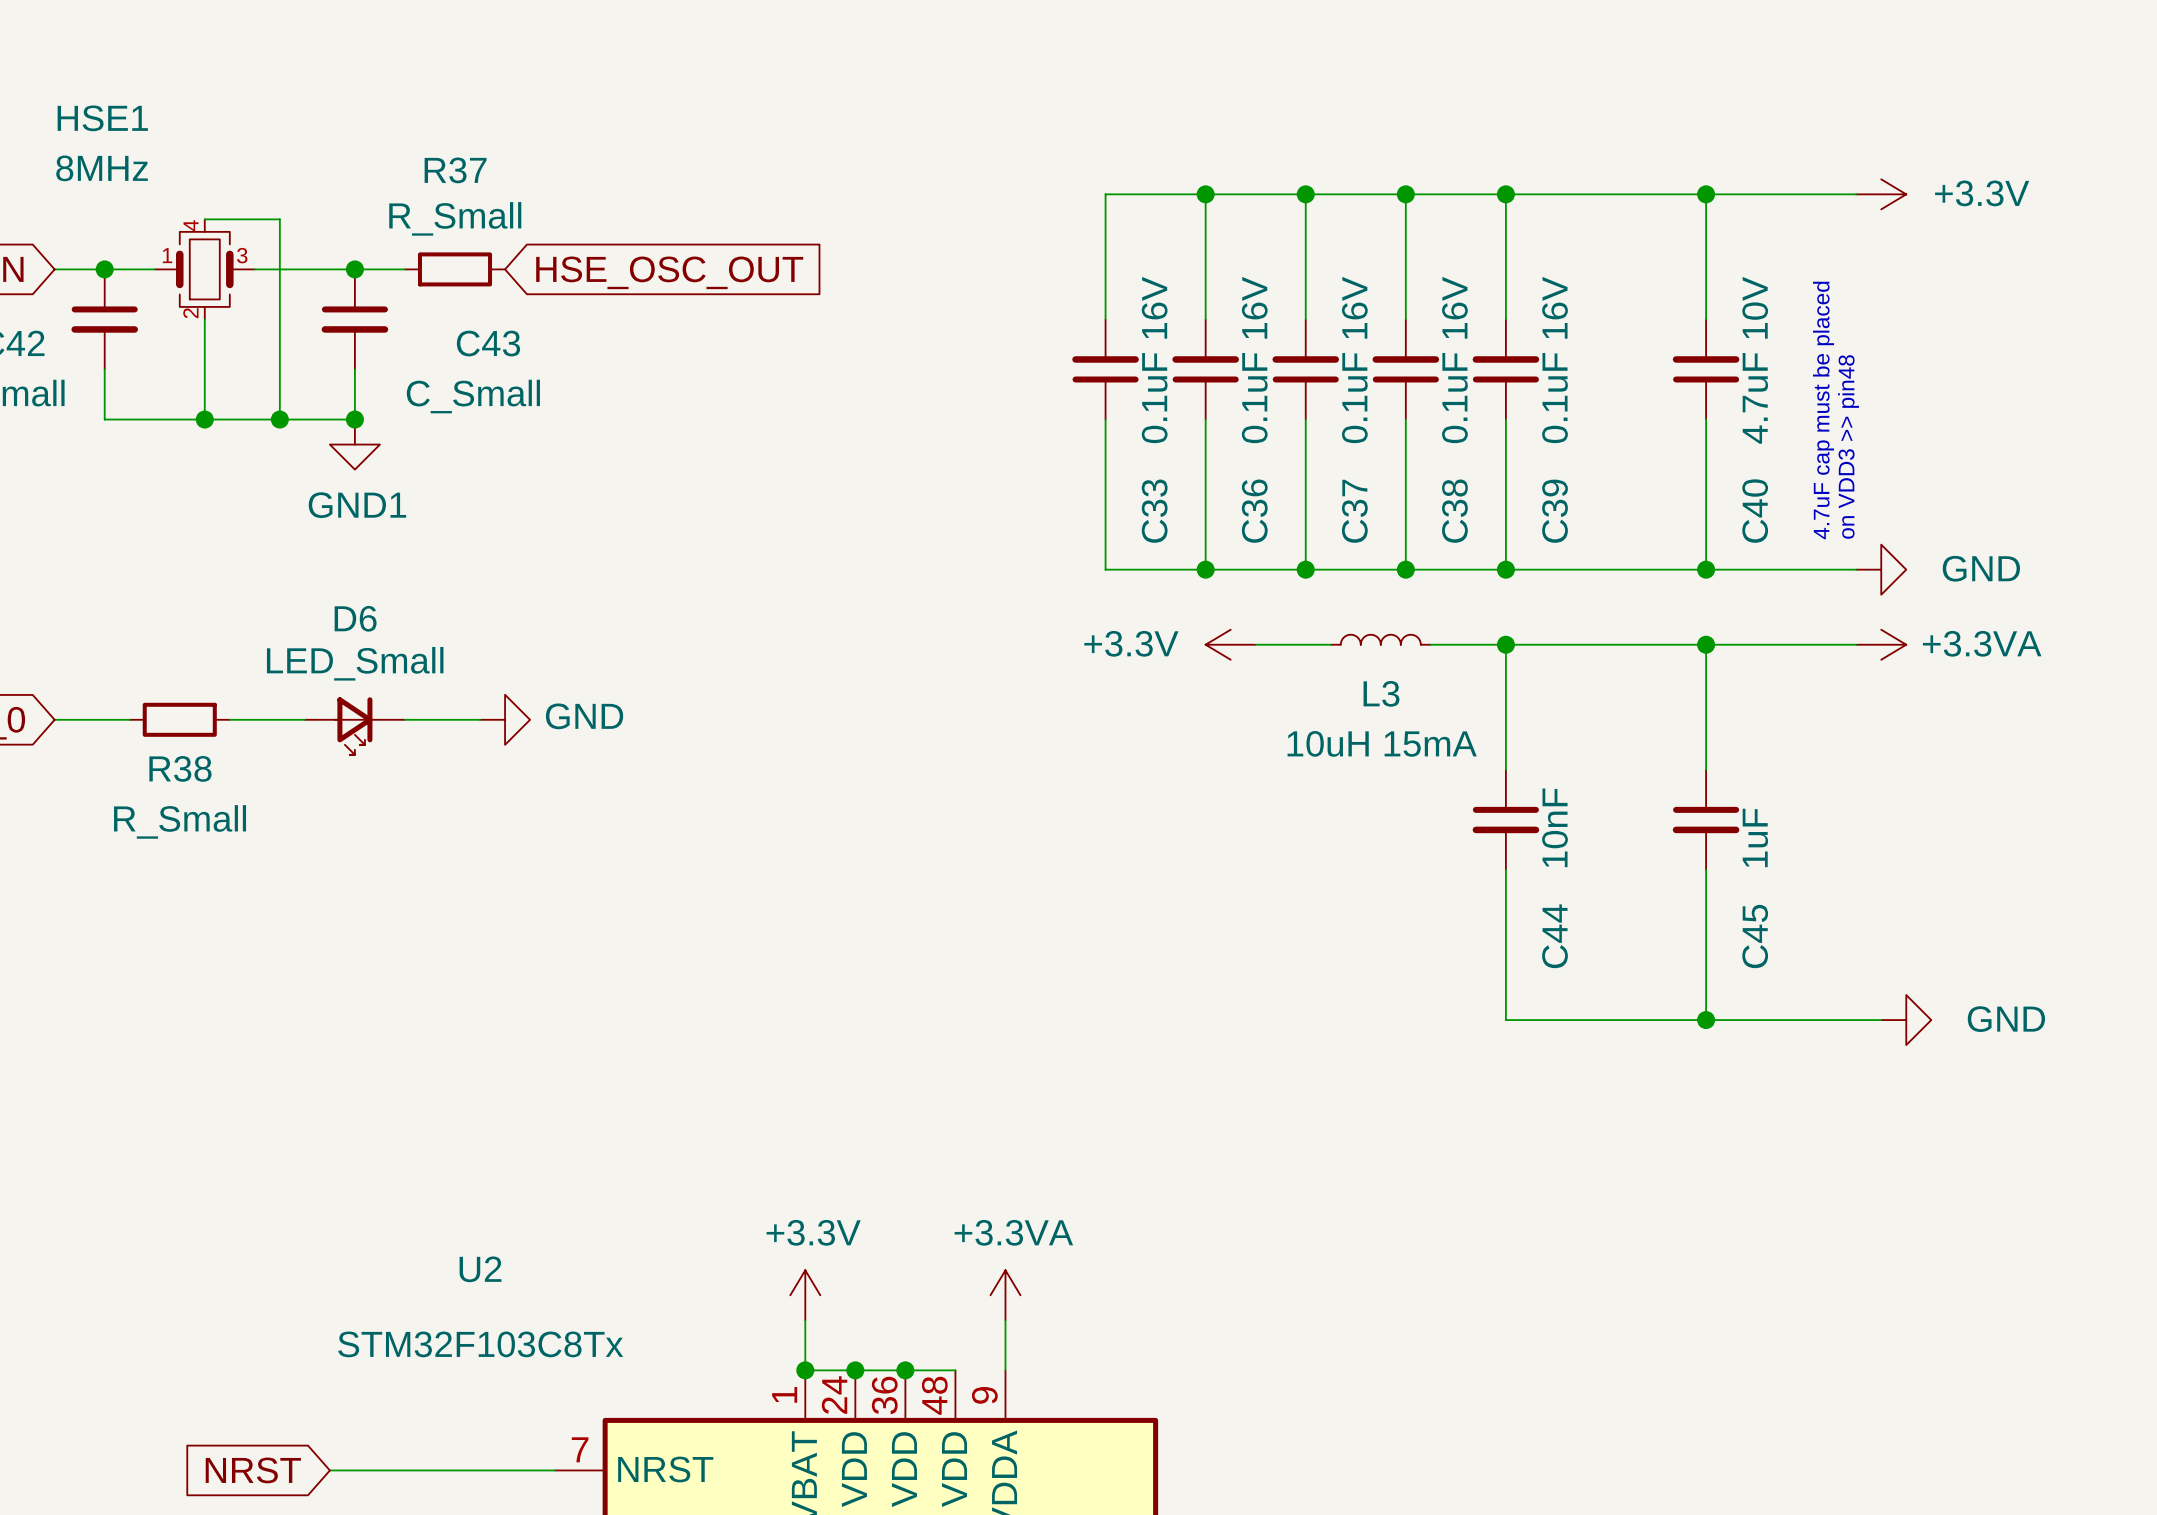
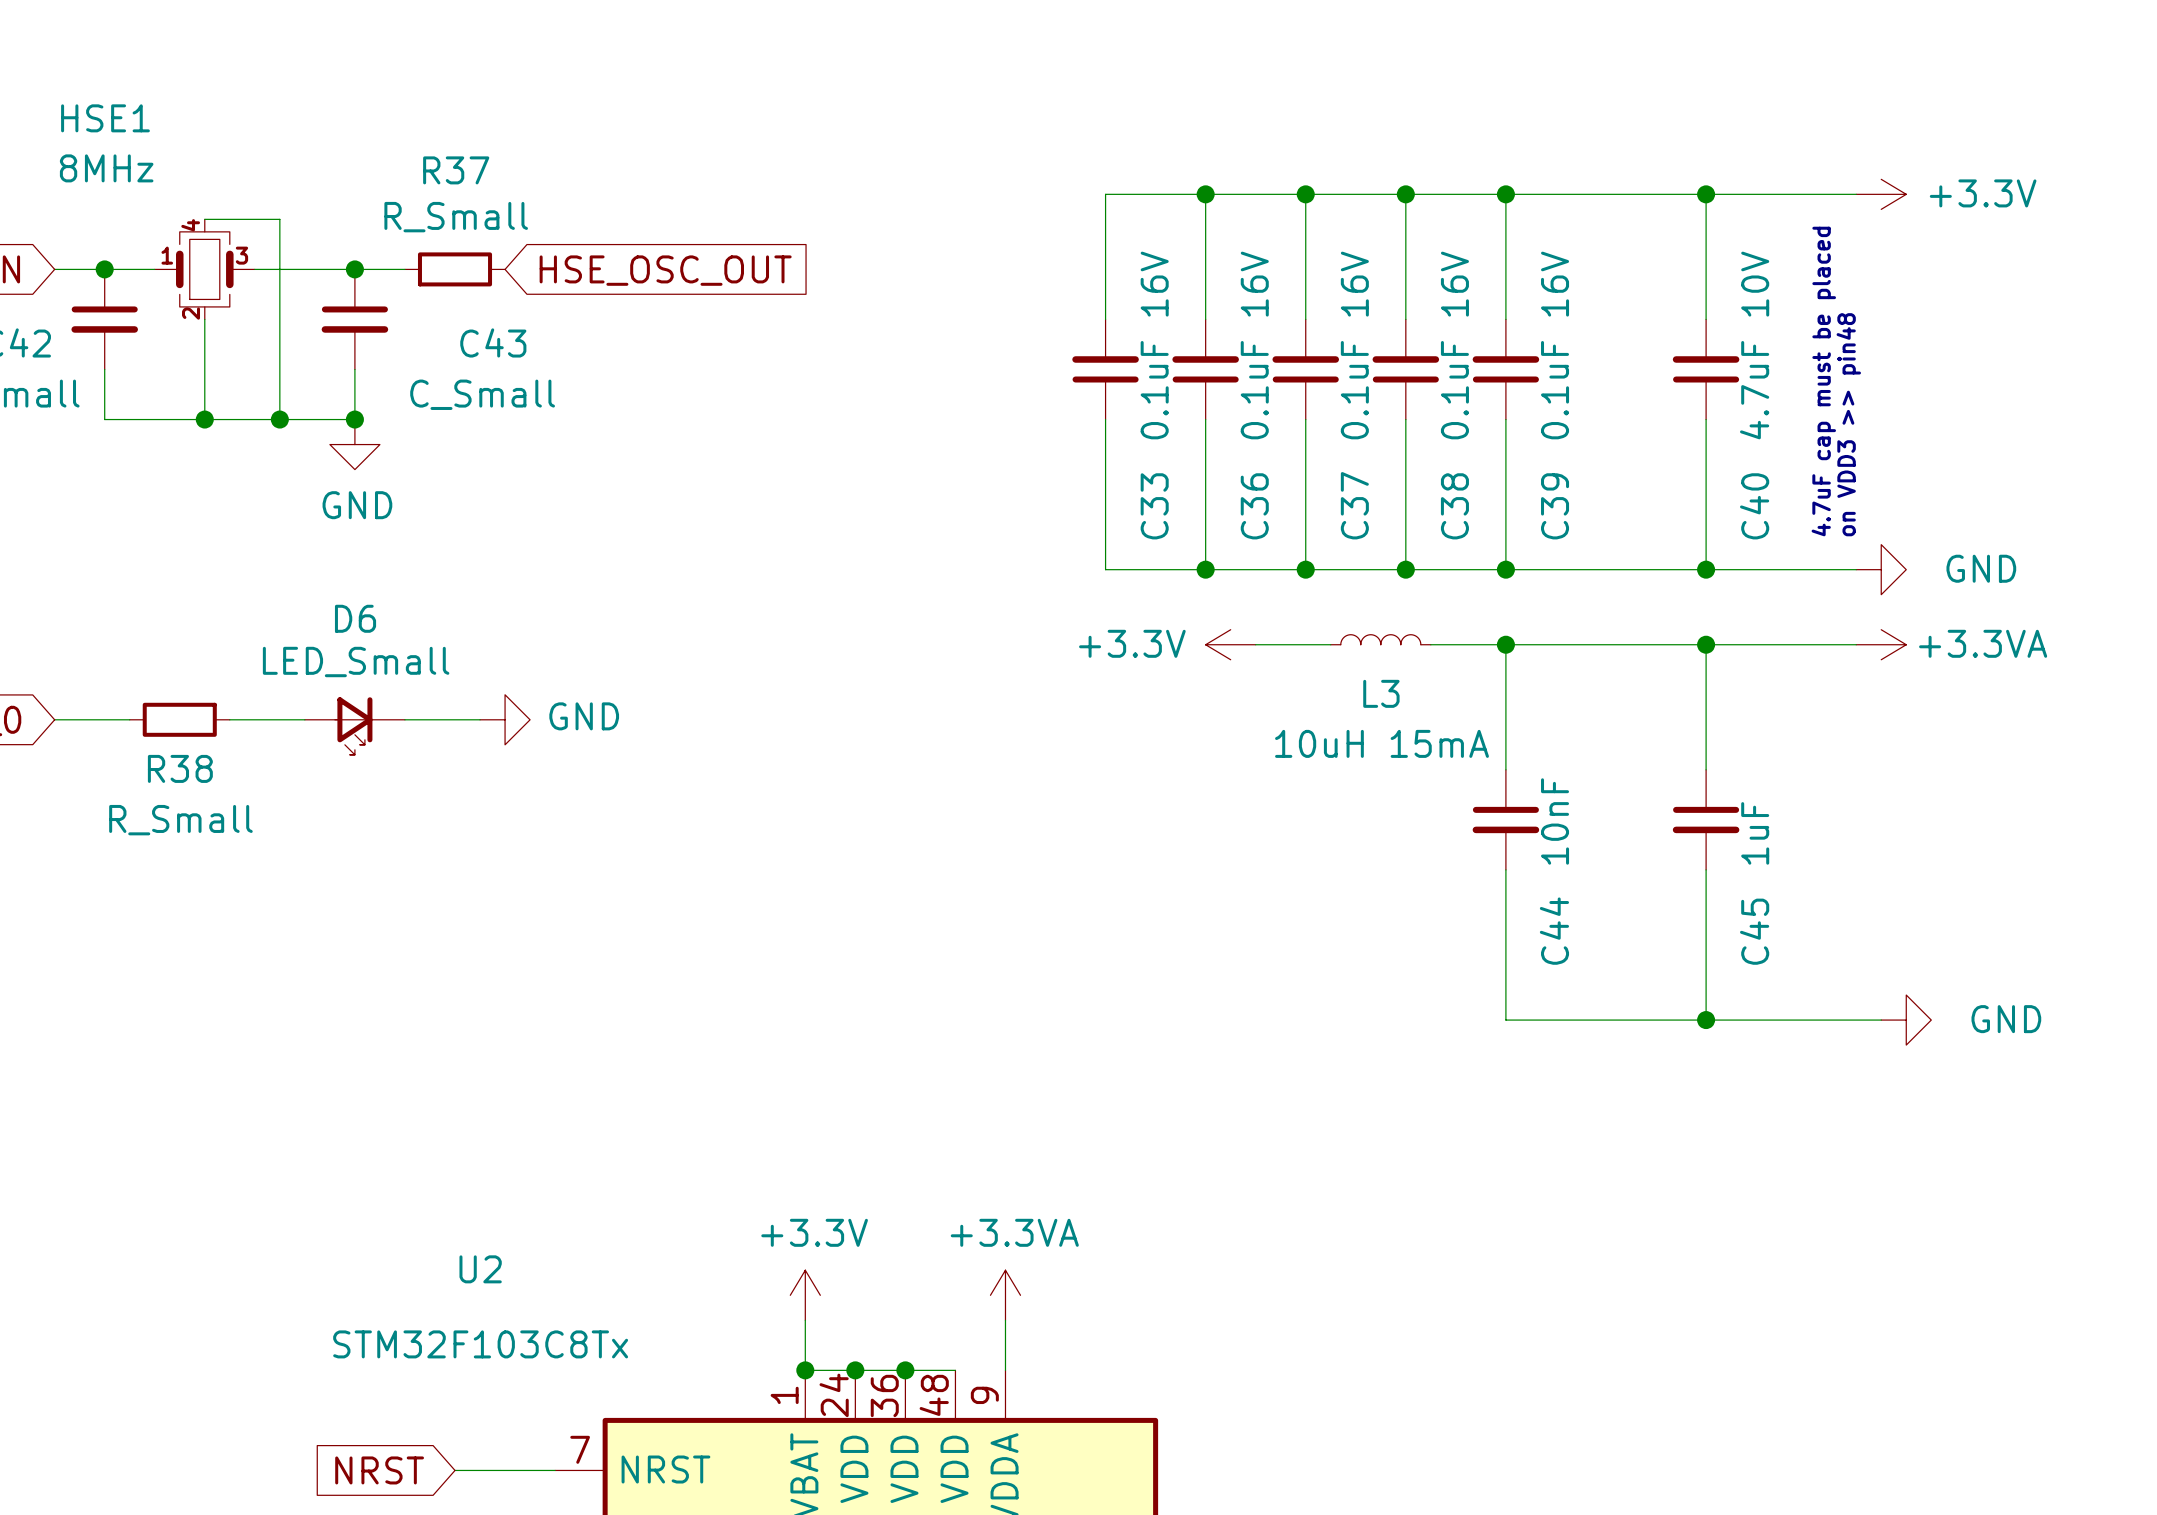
power symbol: GND1 (354, 444) -> GND (354, 444)
global label position: NRST (253, 1470) -> NRST (379, 1470)
wire: (329, 1470) (455, 1470) -> none

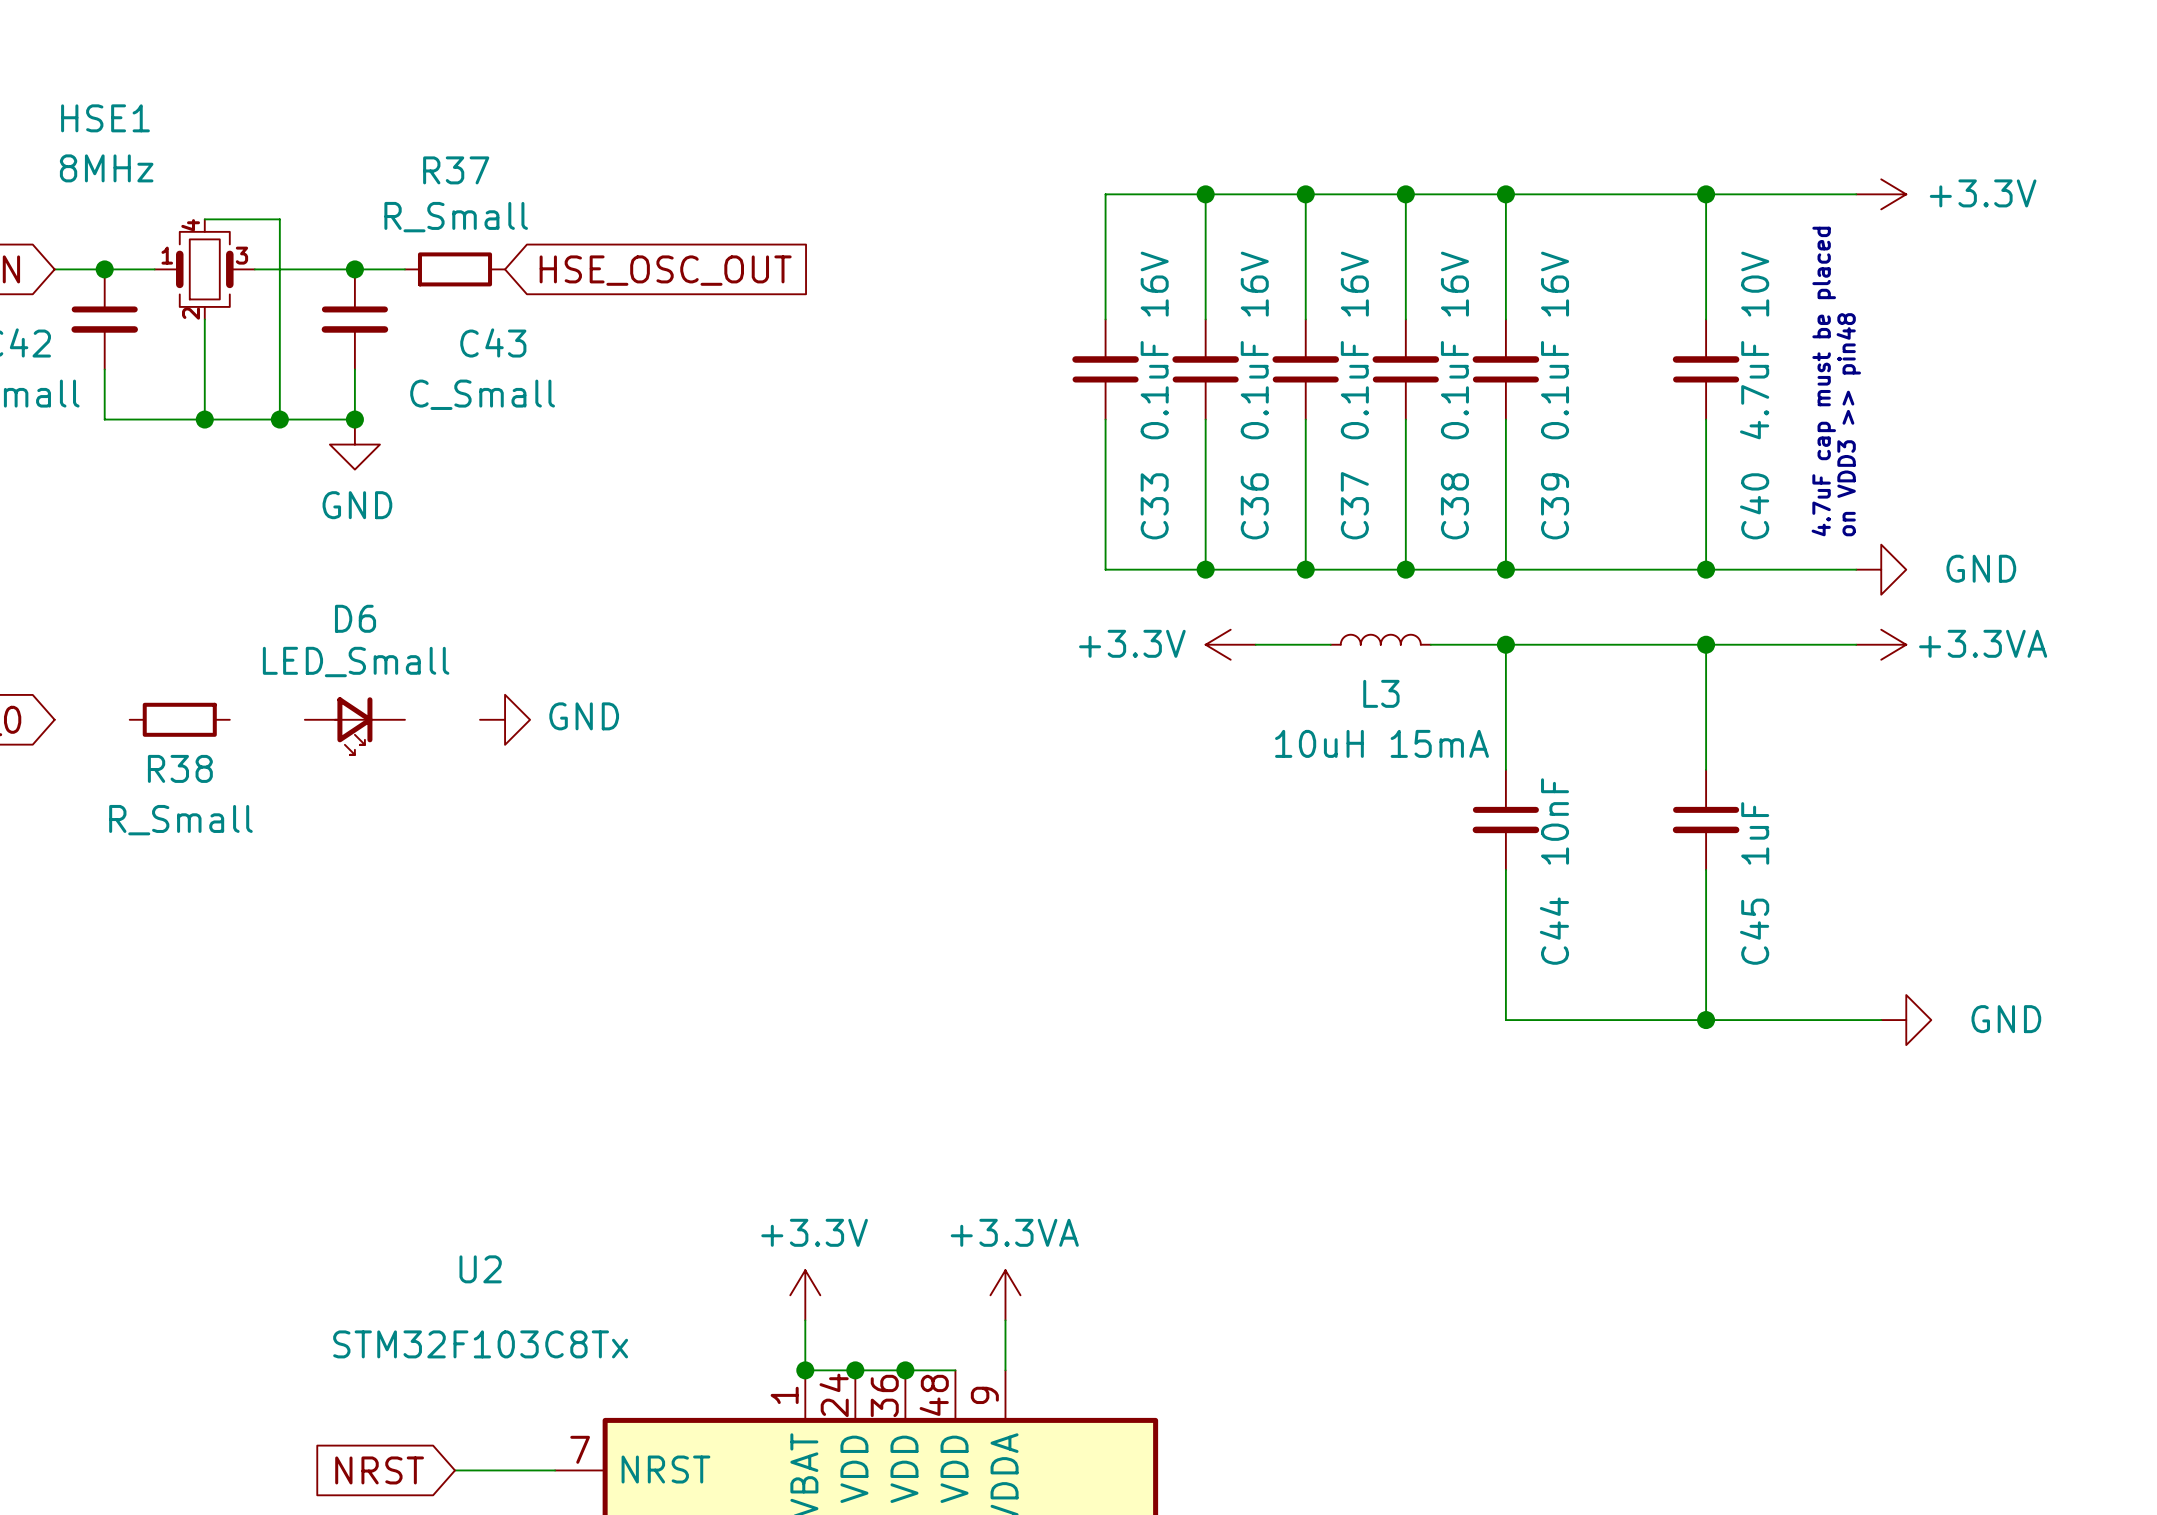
wire: (54, 719) (129, 719) -> none
wire: (229, 719) (304, 719) -> none
wire: (404, 719) (480, 719) -> none

